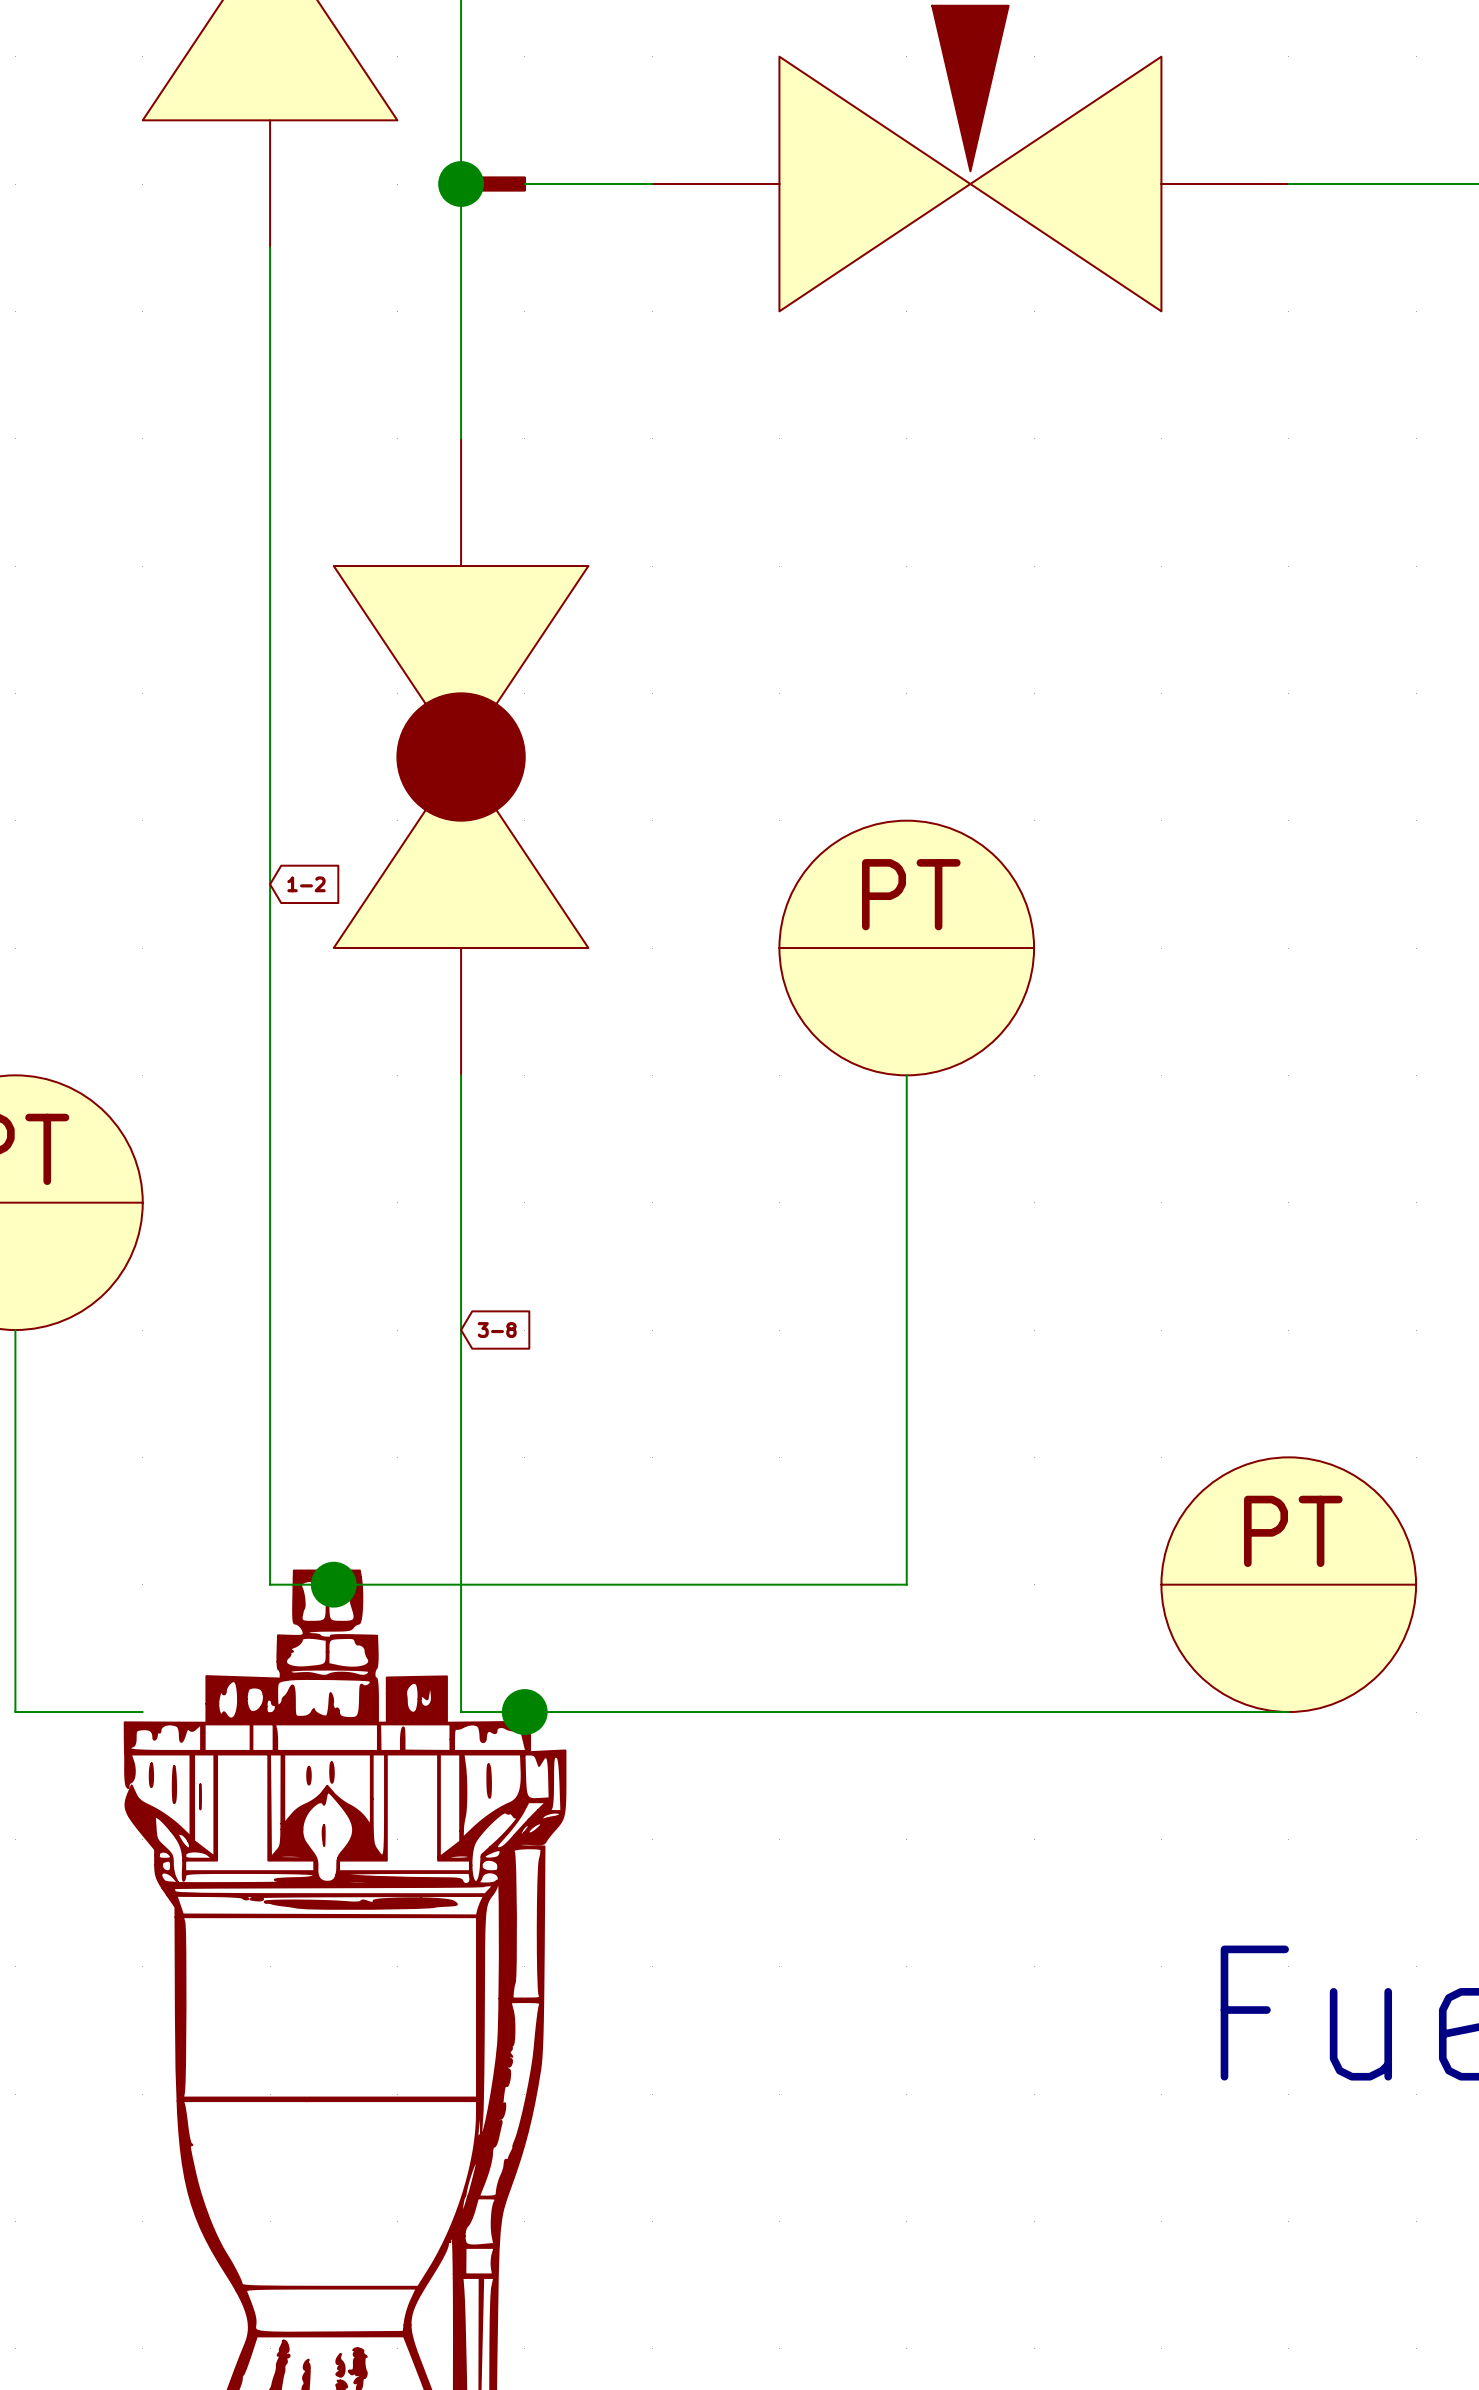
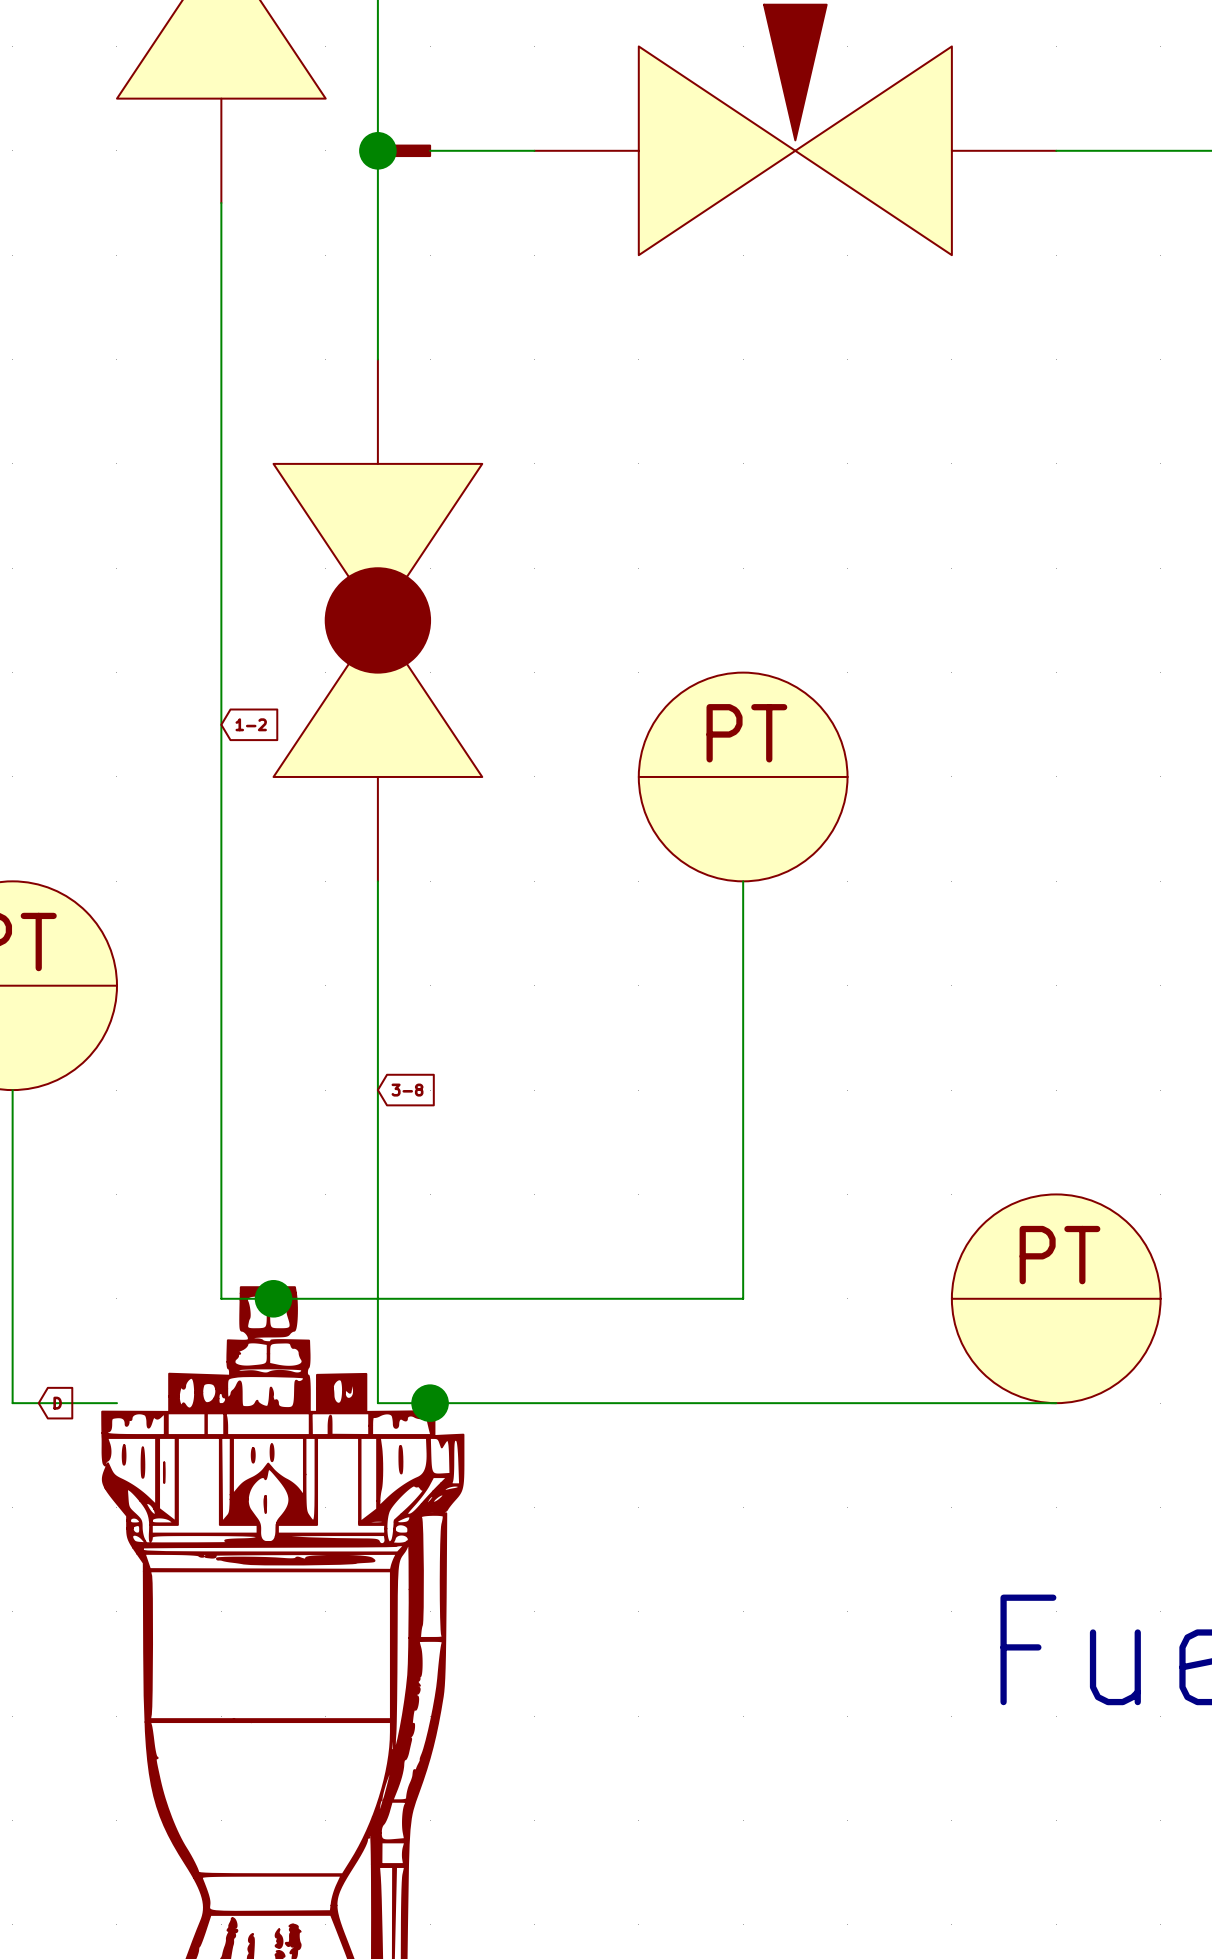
global label: none -> D (57, 1403)

